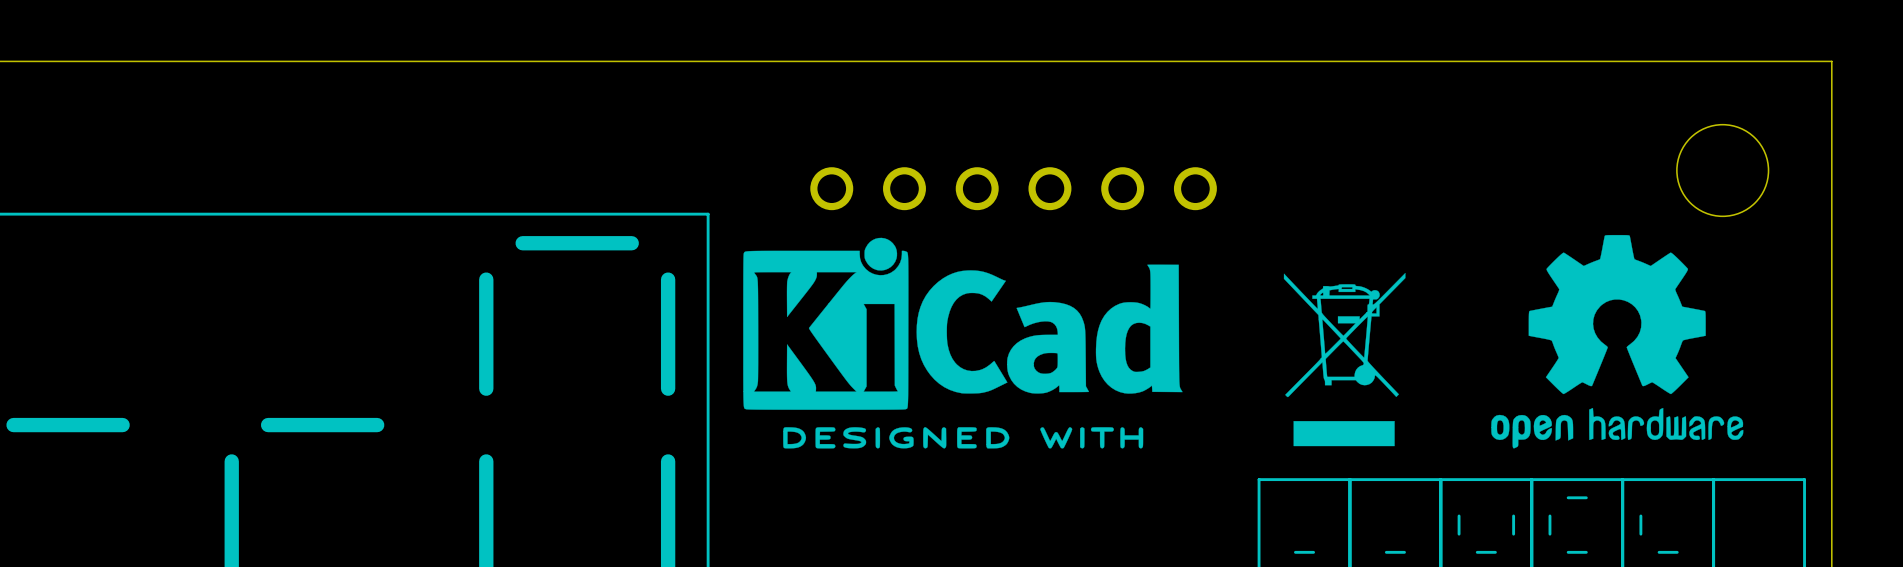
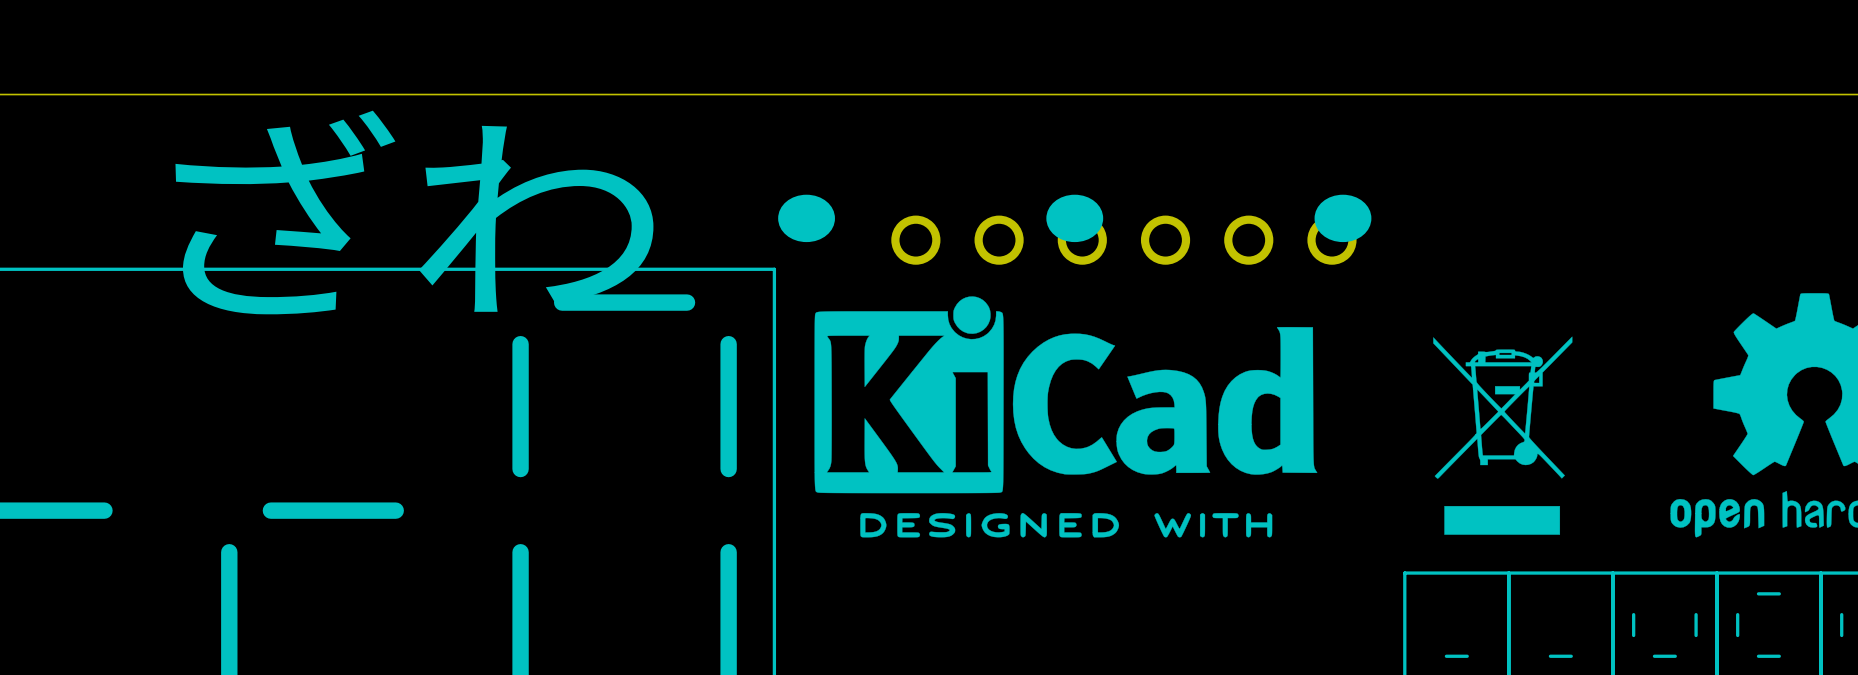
text: none -> ざわ・・・ (773, 212)

